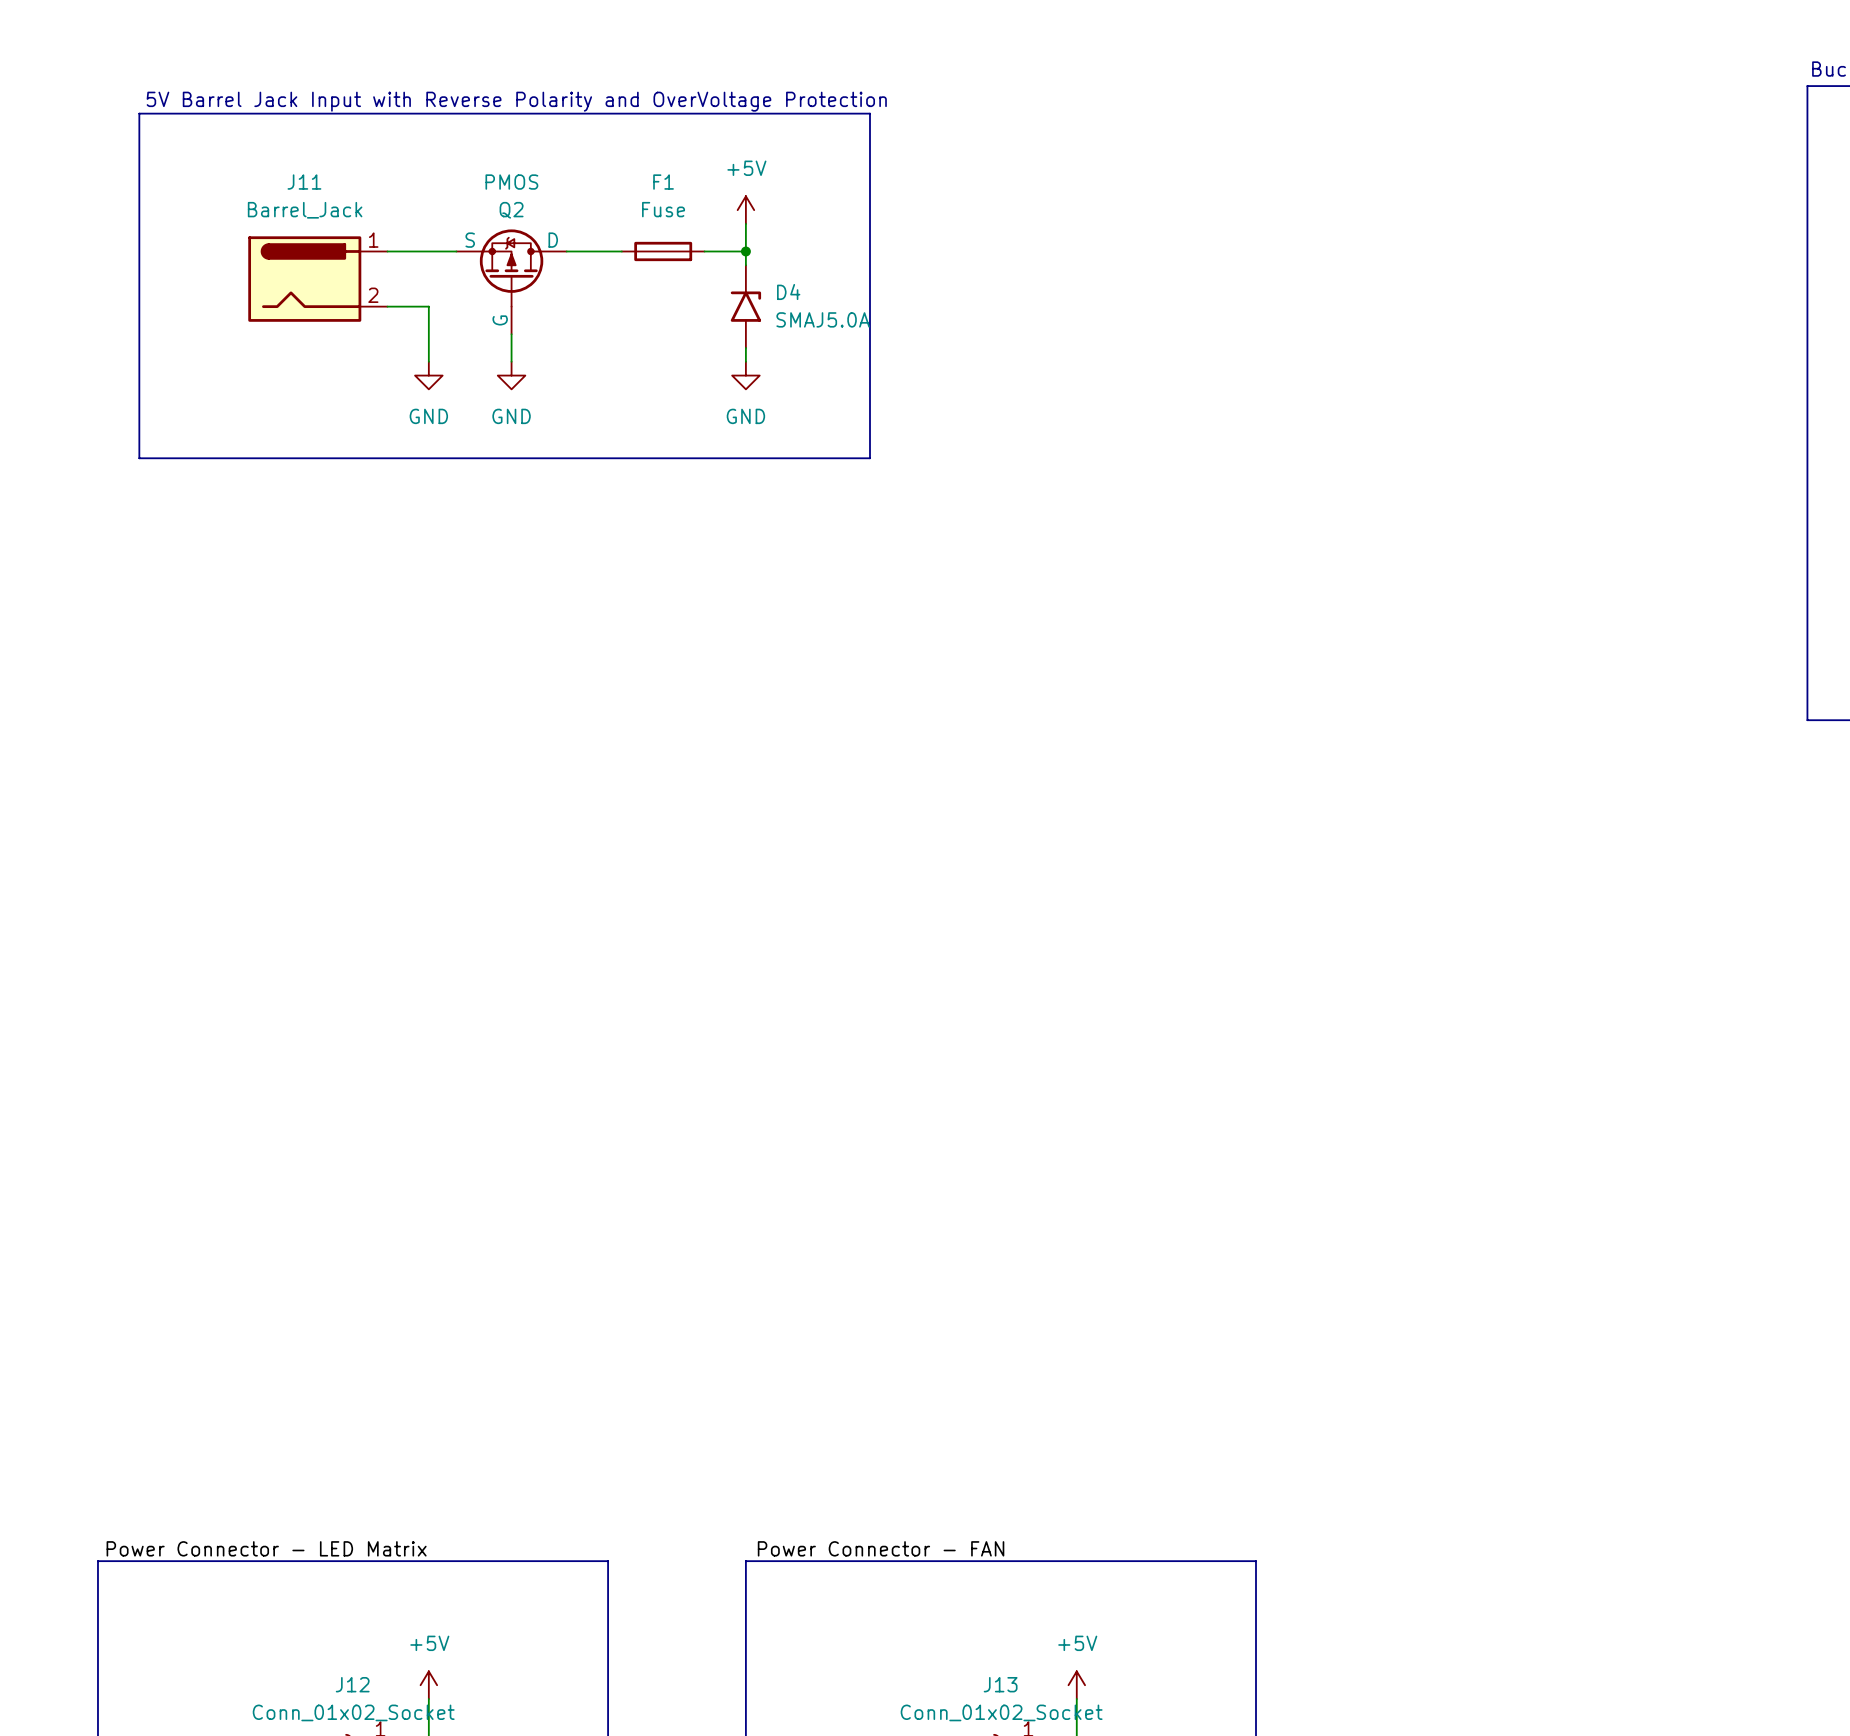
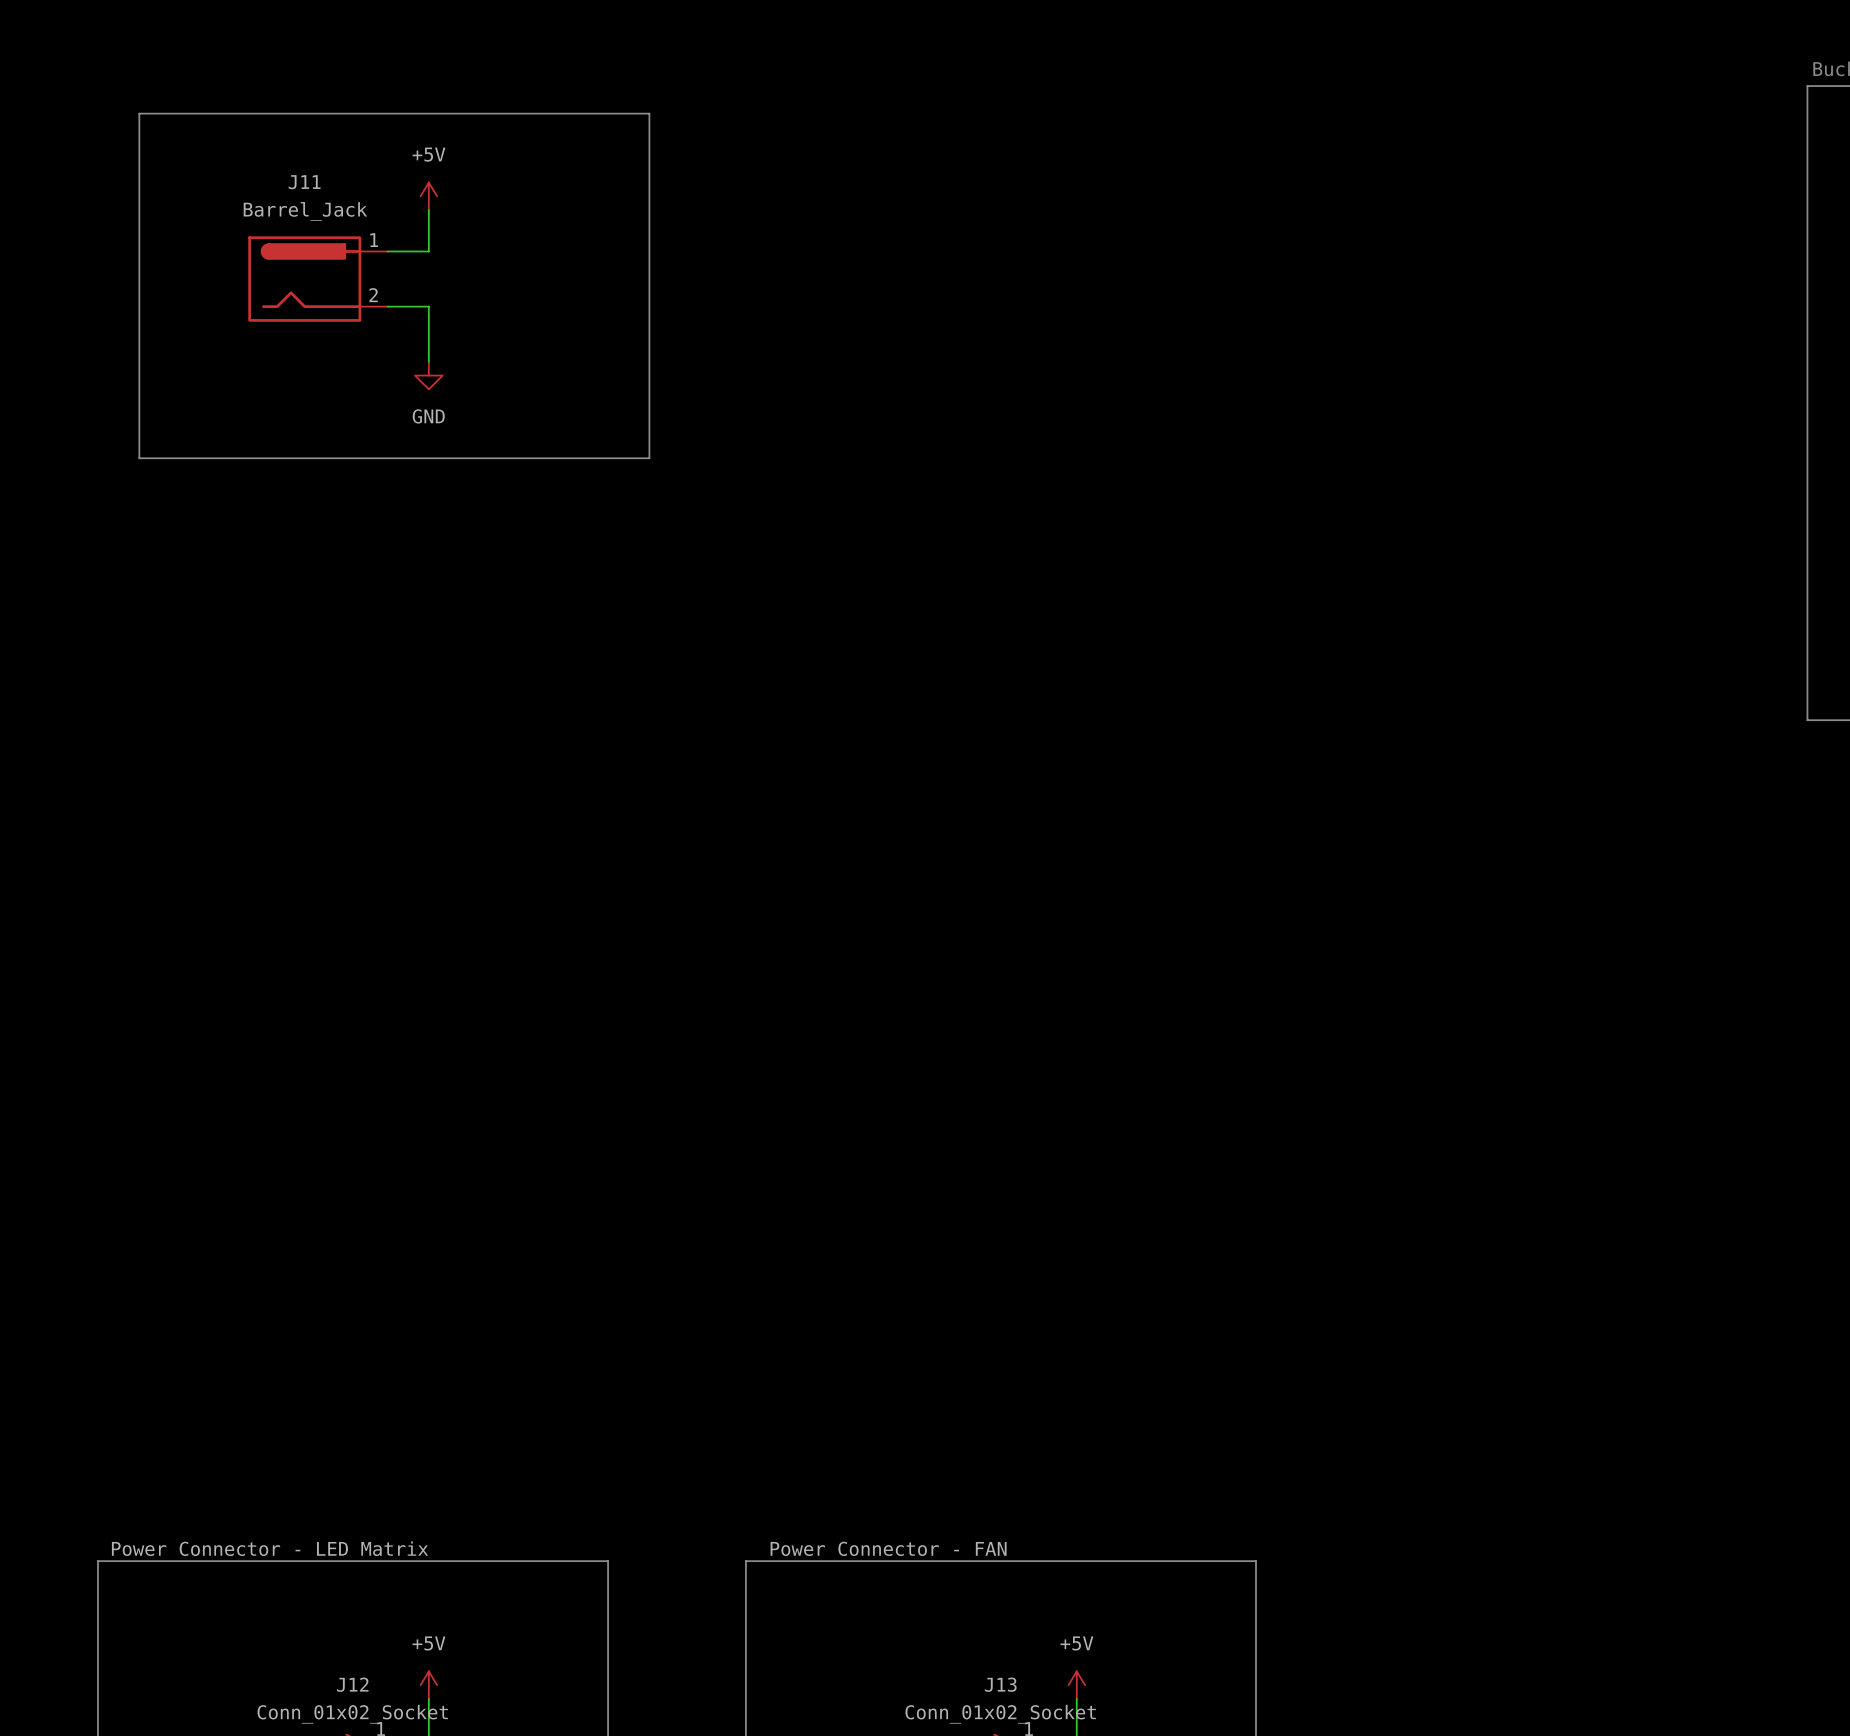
text: 5V Barrel Jack Input with Reverse Polarity and OverVoltage Protection (516, 101) -> none
line: (649, 113) (869, 113) (869, 458) (649, 458) -> (649, 113) (649, 458)
power symbol: none -> +5V (428, 196)
power symbol: +5V (745, 210) -> none
wire: (745, 223) (745, 265) -> none
wire: (428, 251) (456, 251) -> (428, 251) (428, 210)
wire: (566, 251) (621, 251) -> none
F1: Fuse (663, 251) -> none
wire: (704, 251) (745, 251) -> none
junction: (745, 251) -> none
Q2: PMOS (511, 281) -> none
D4: SMAJ5.0A (745, 306) -> none
wire: (511, 334) (511, 361) -> none
wire: (745, 347) (745, 361) -> none
power symbol: GND (511, 375) -> none
power symbol: GND (745, 375) -> none

